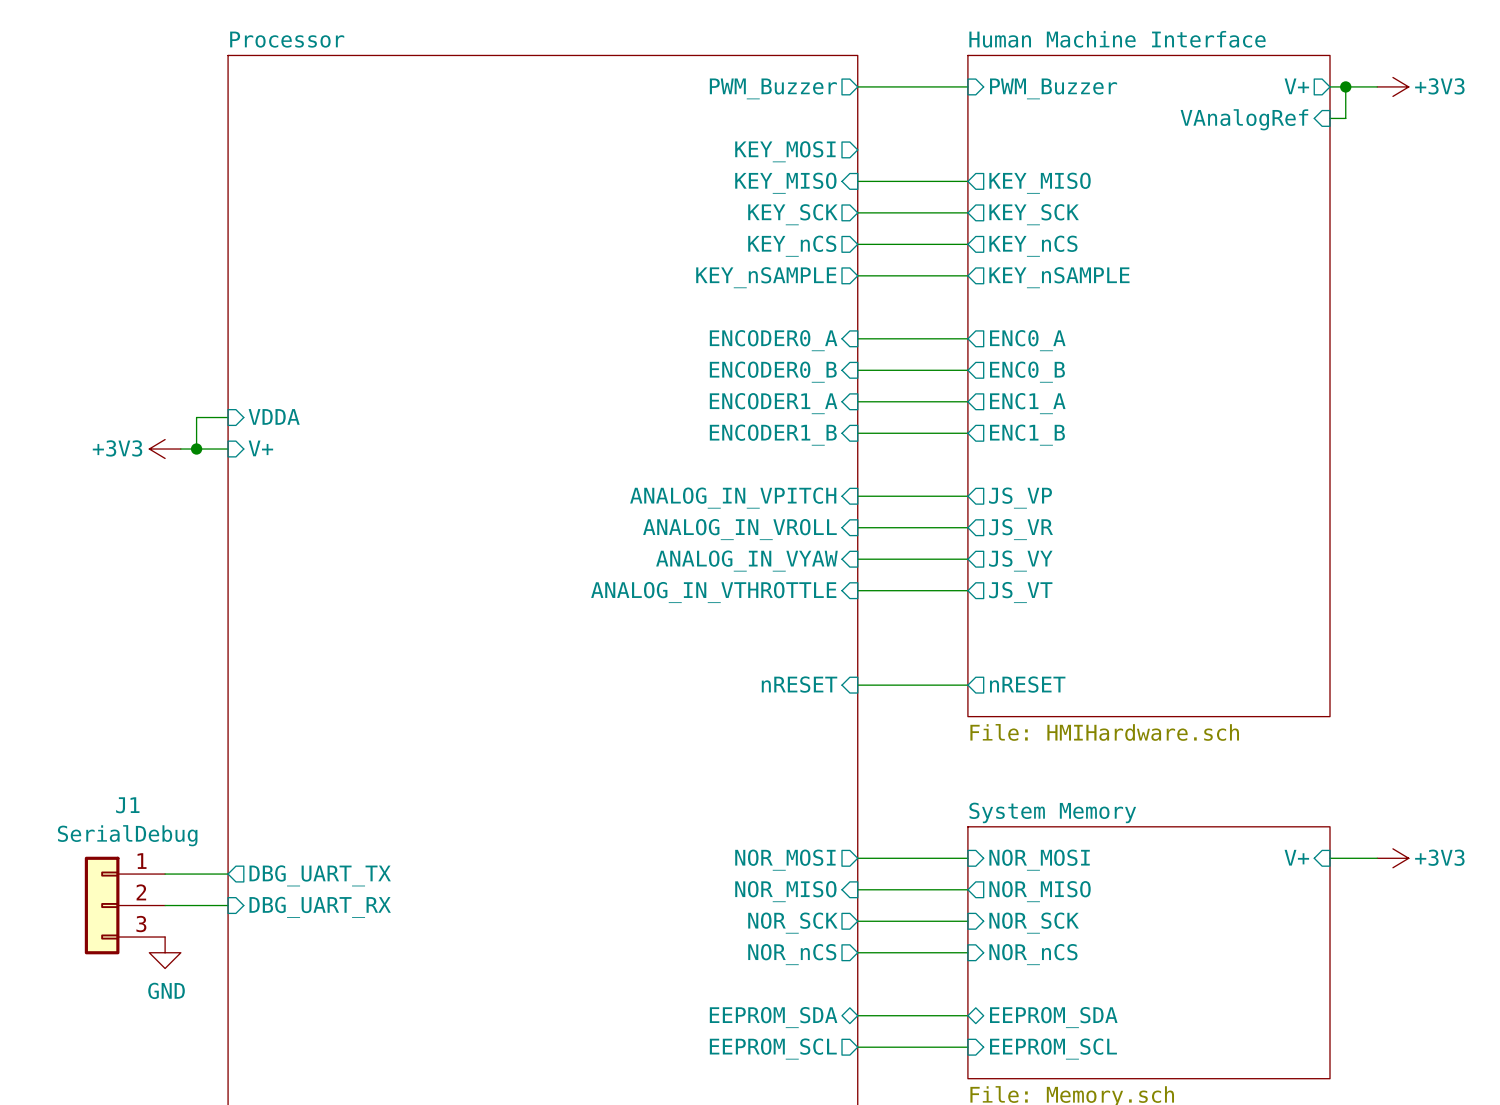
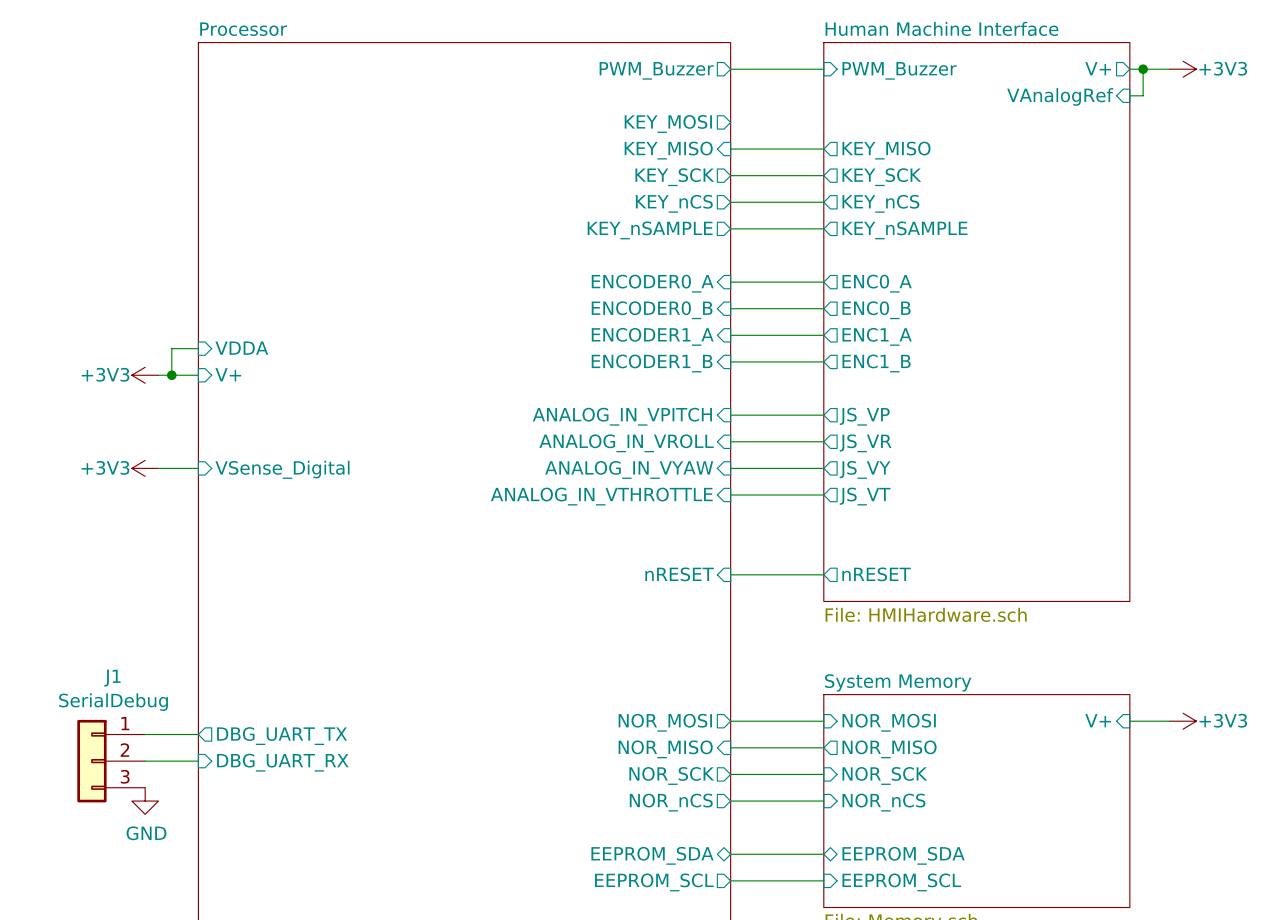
power symbol: none -> +3V3 (145, 468)
wire: none -> (158, 468) (198, 468)
sheet pin: none -> VSense_Digital (282, 469)

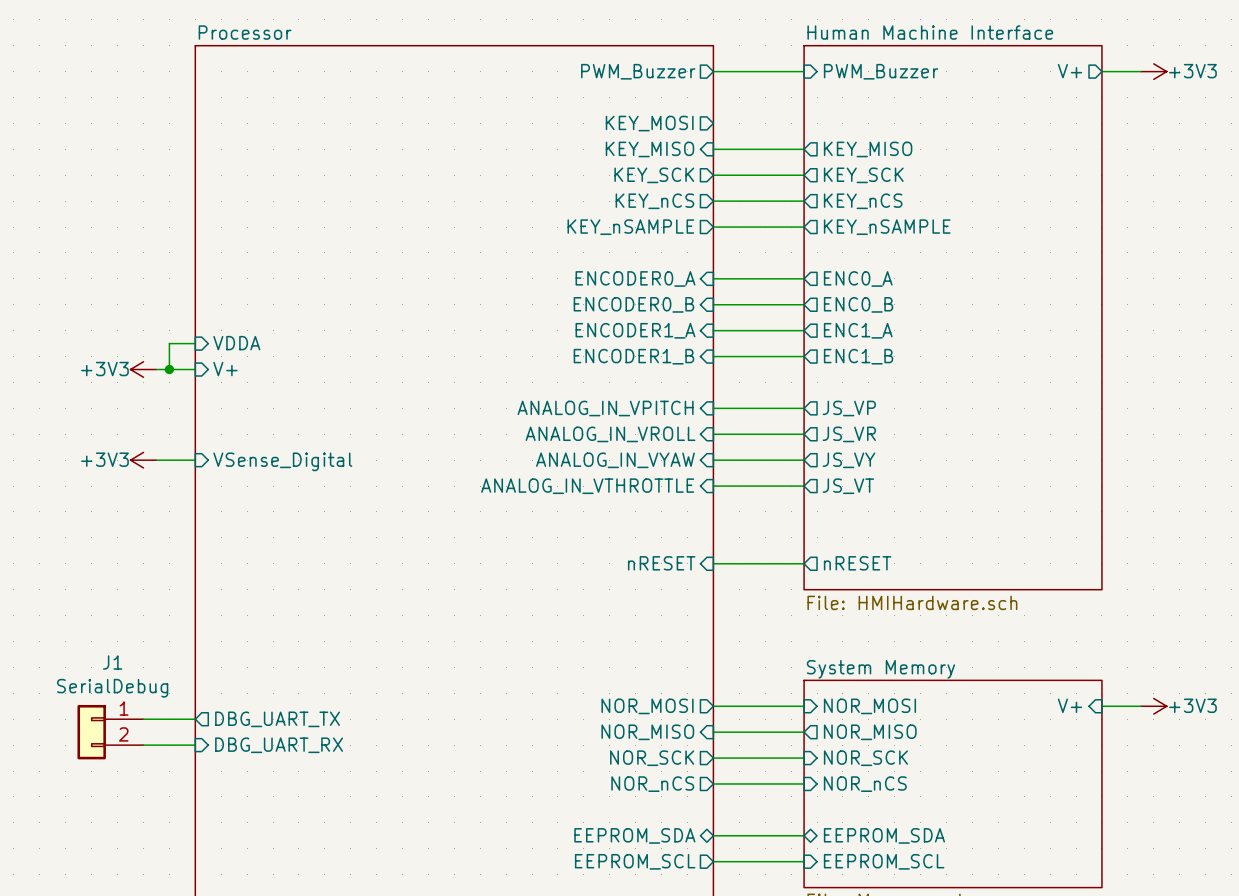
wire: (1143, 69) (1143, 95) (1129, 95) -> none
junction: (1143, 69) -> none
sheet pin: VAnalogRef (1060, 96) -> none
J1 symbol: [77, 719, 146, 803] -> [77, 704, 144, 760]
power symbol: GND (145, 801) -> none

